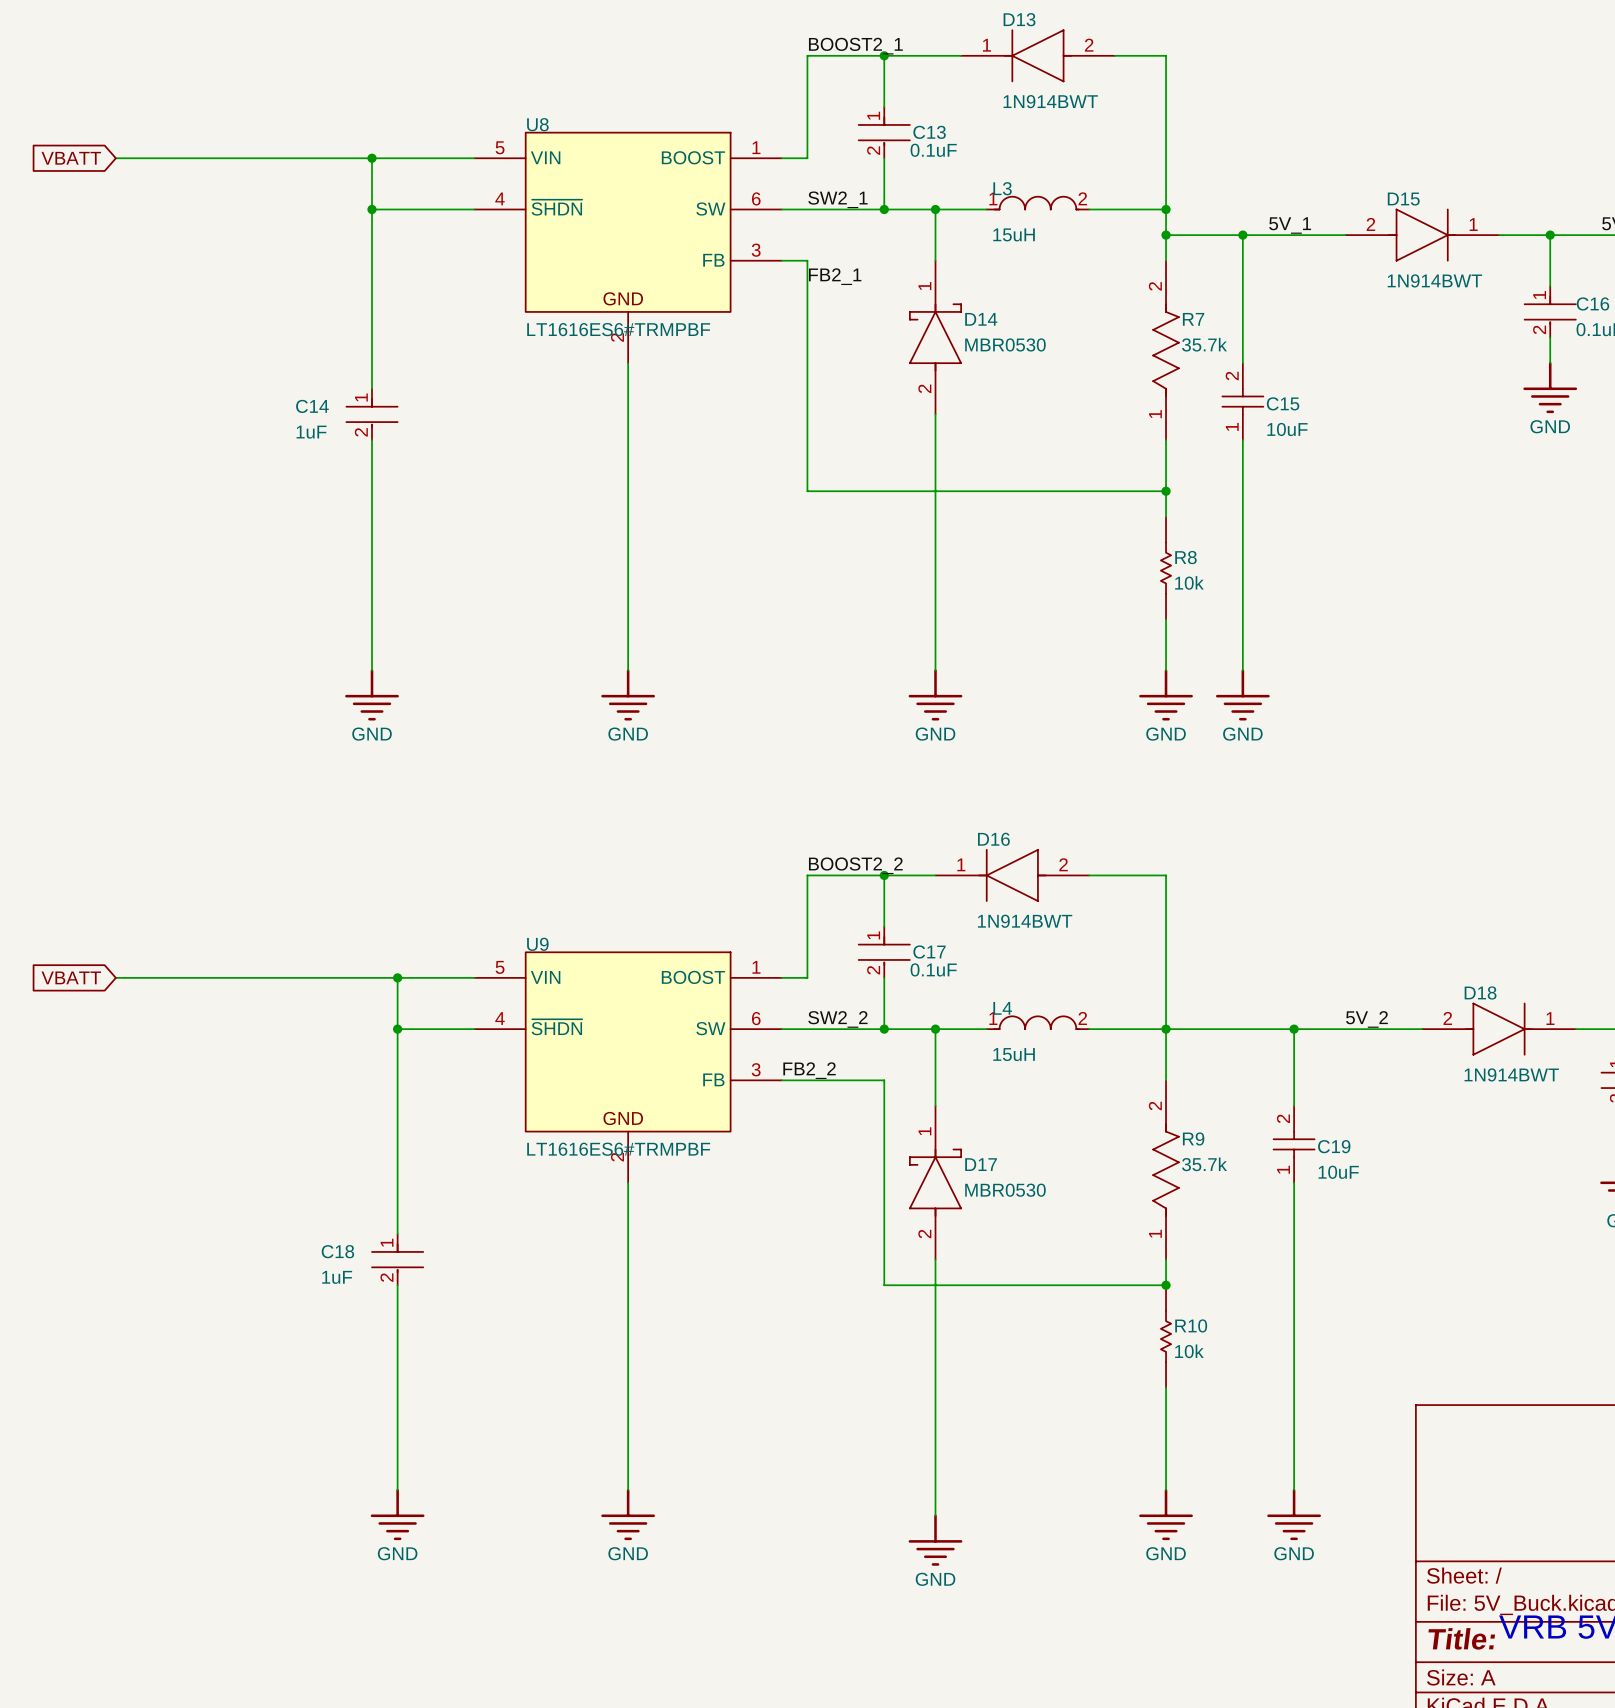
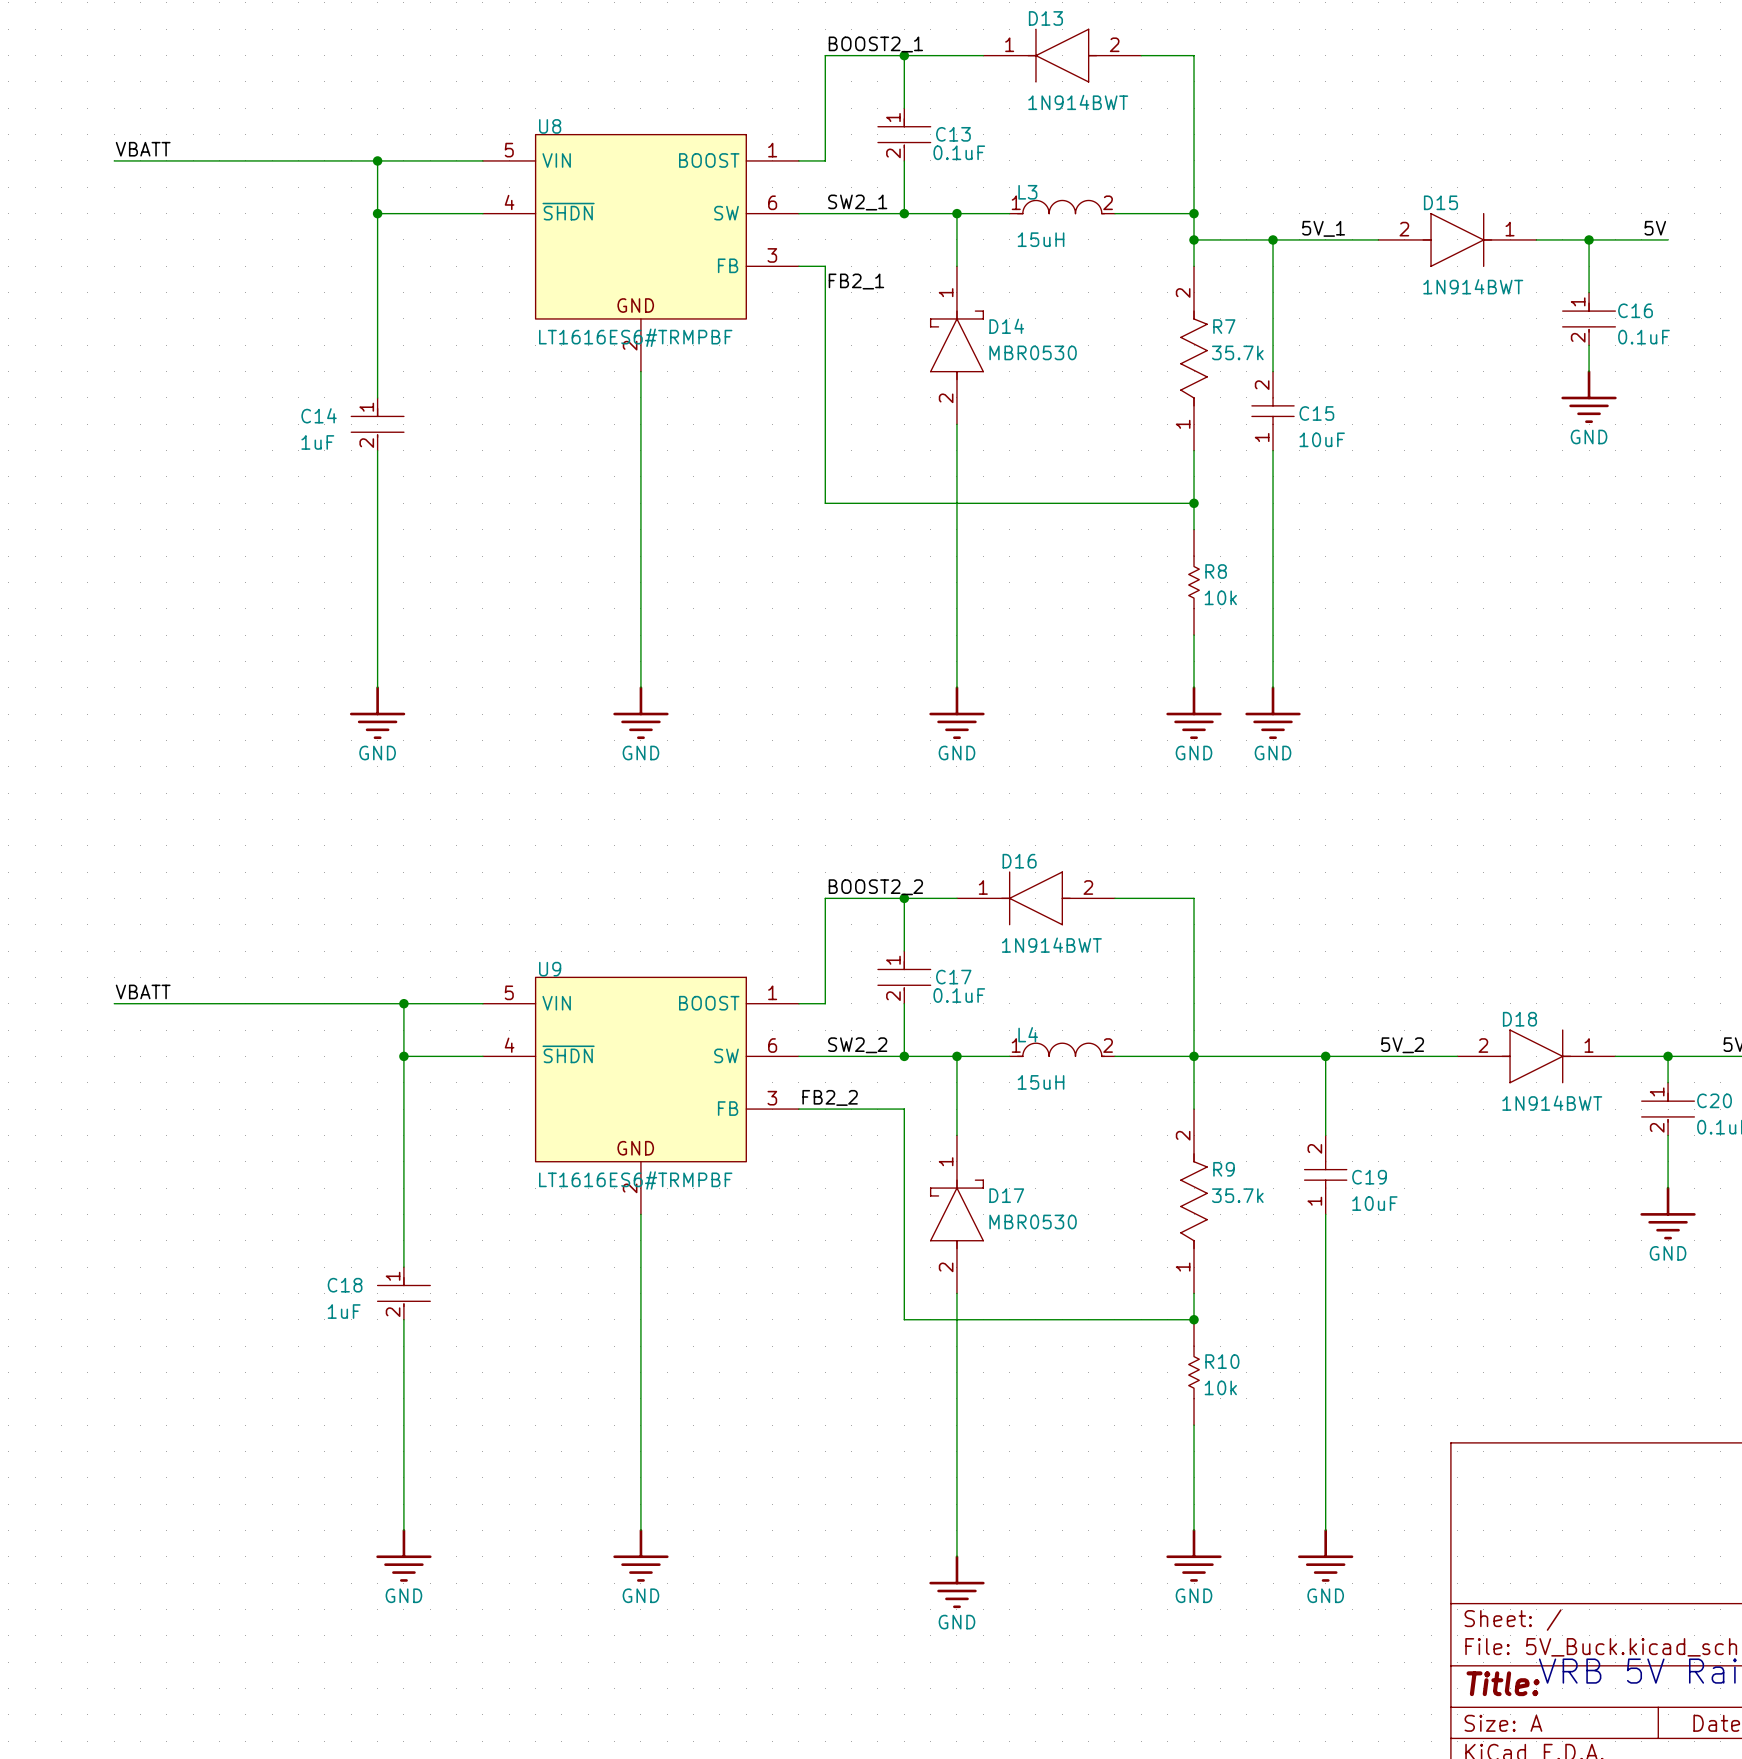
label: none -> VBATT (143, 149)
global label: VBATT (71, 158) -> none
label: none -> VBATT (143, 991)
global label: VBATT (71, 977) -> none

